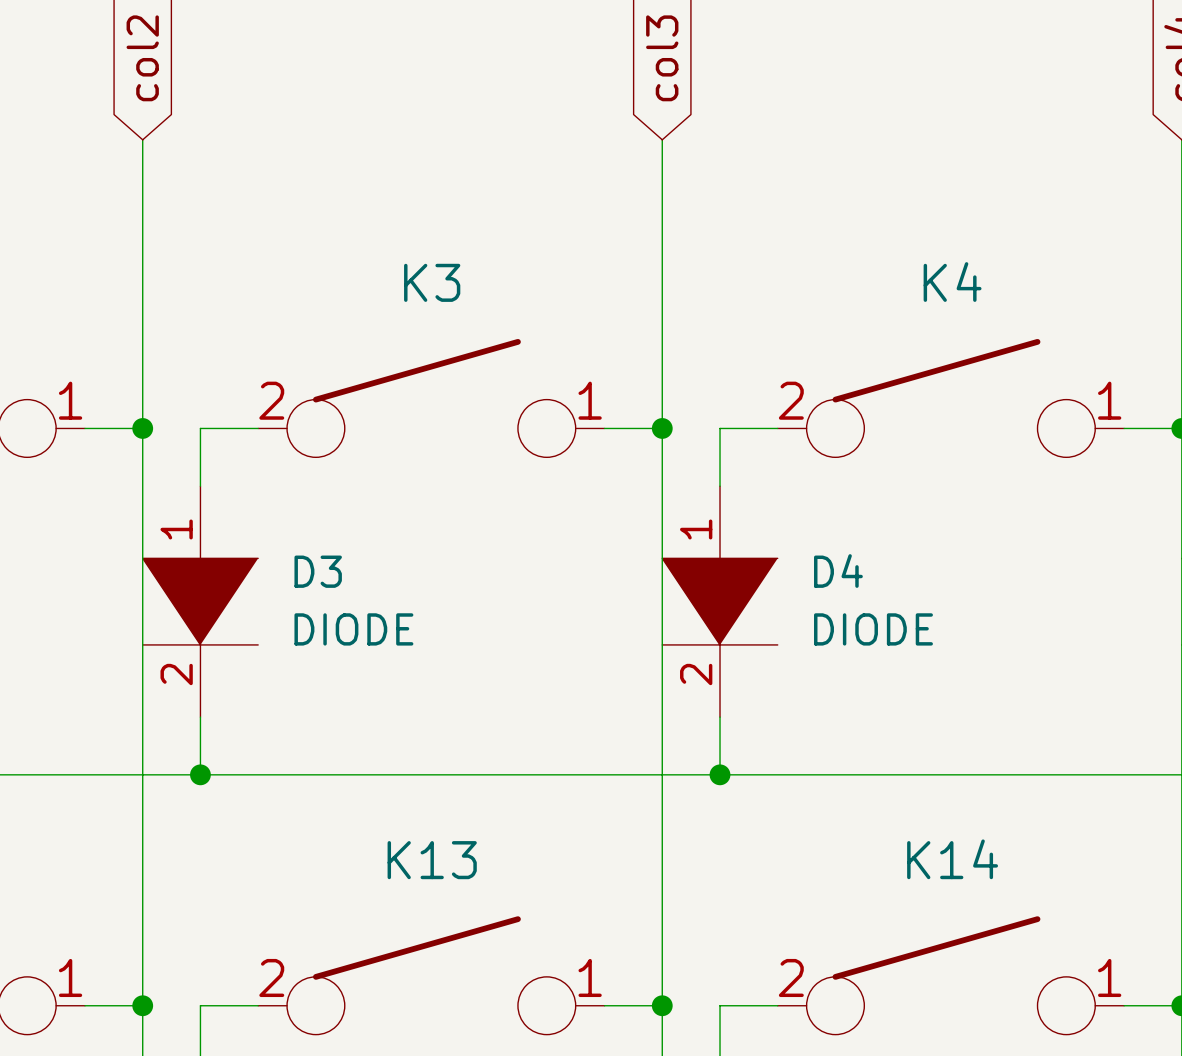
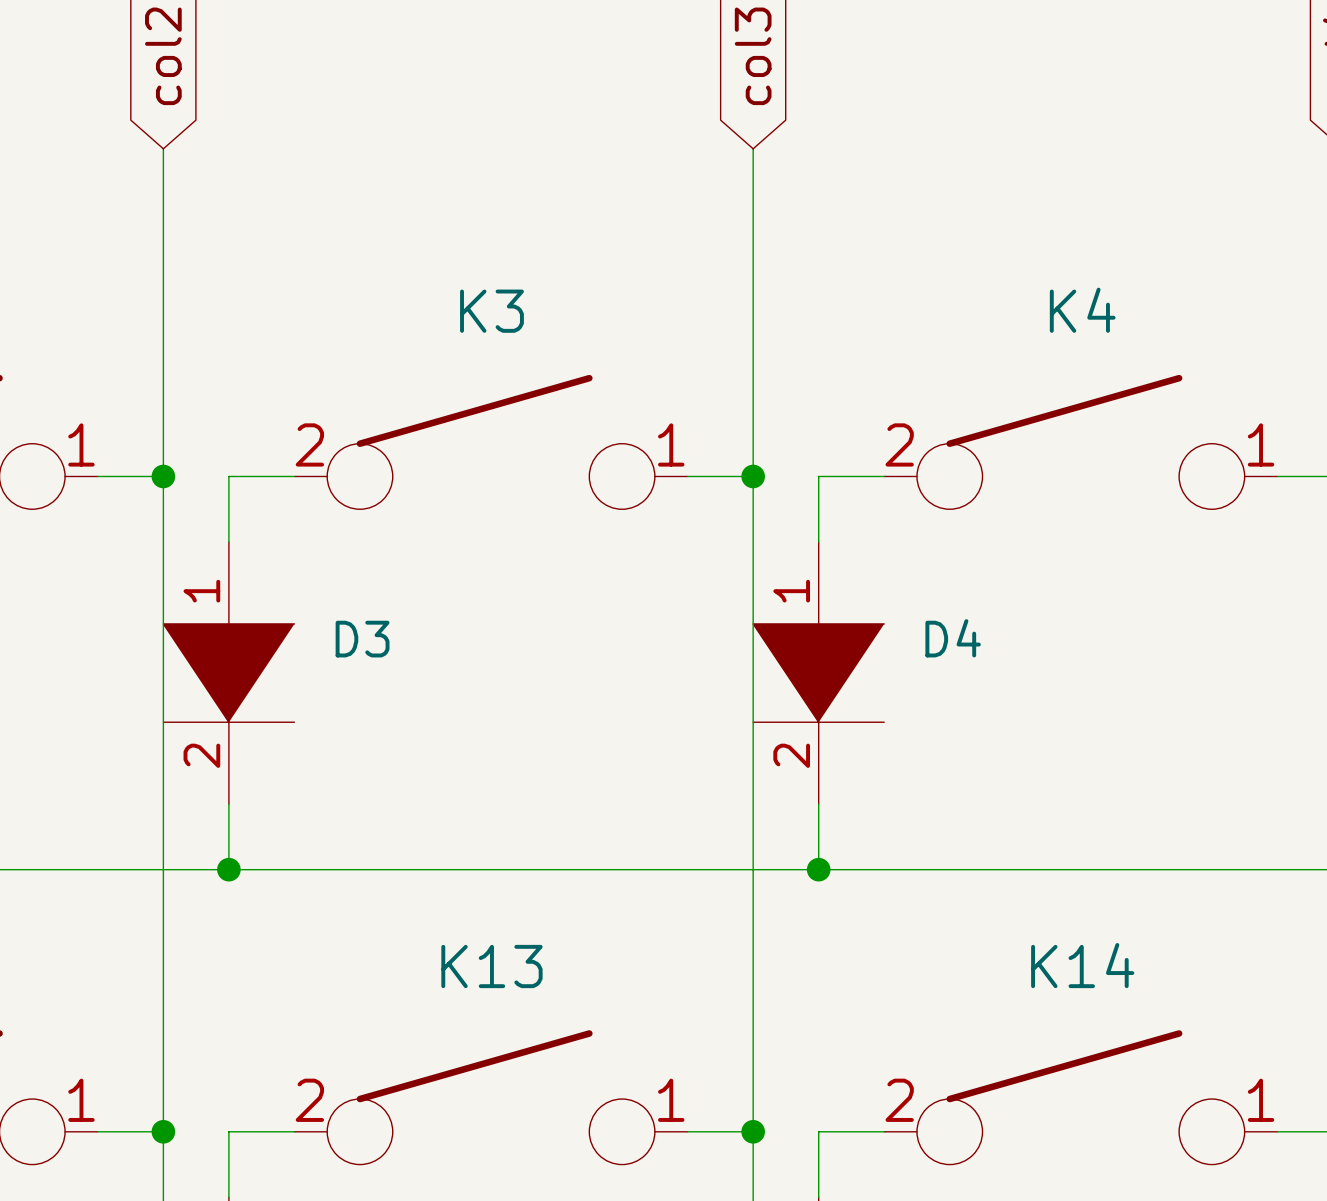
D3 value: DIODE (353, 629) -> none
D4 value: DIODE (873, 629) -> none

